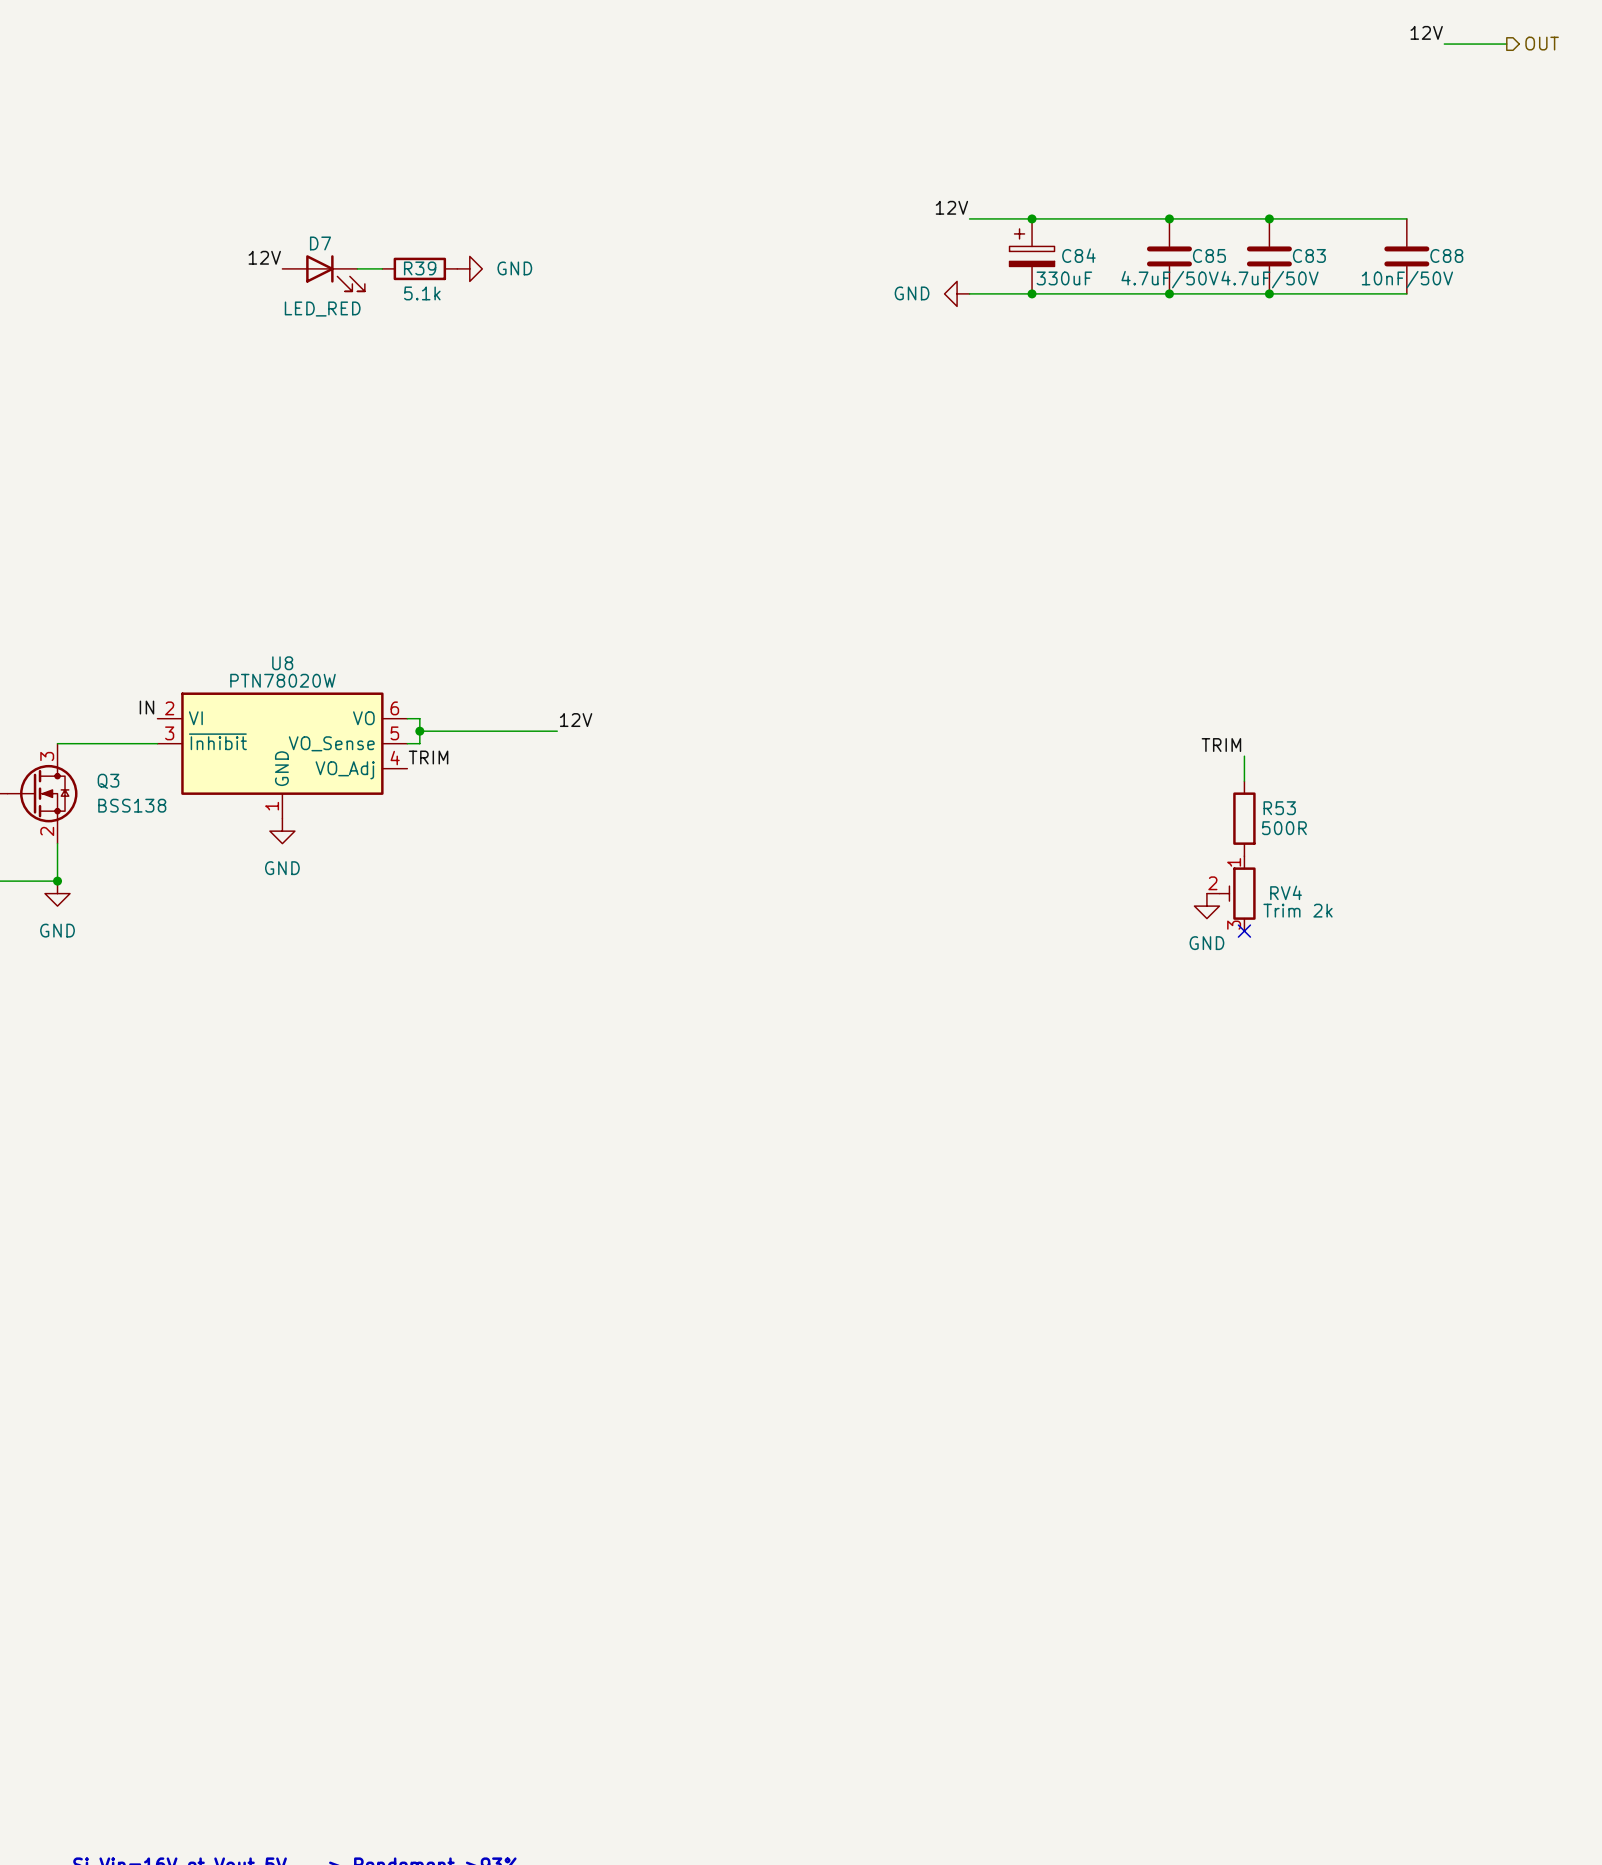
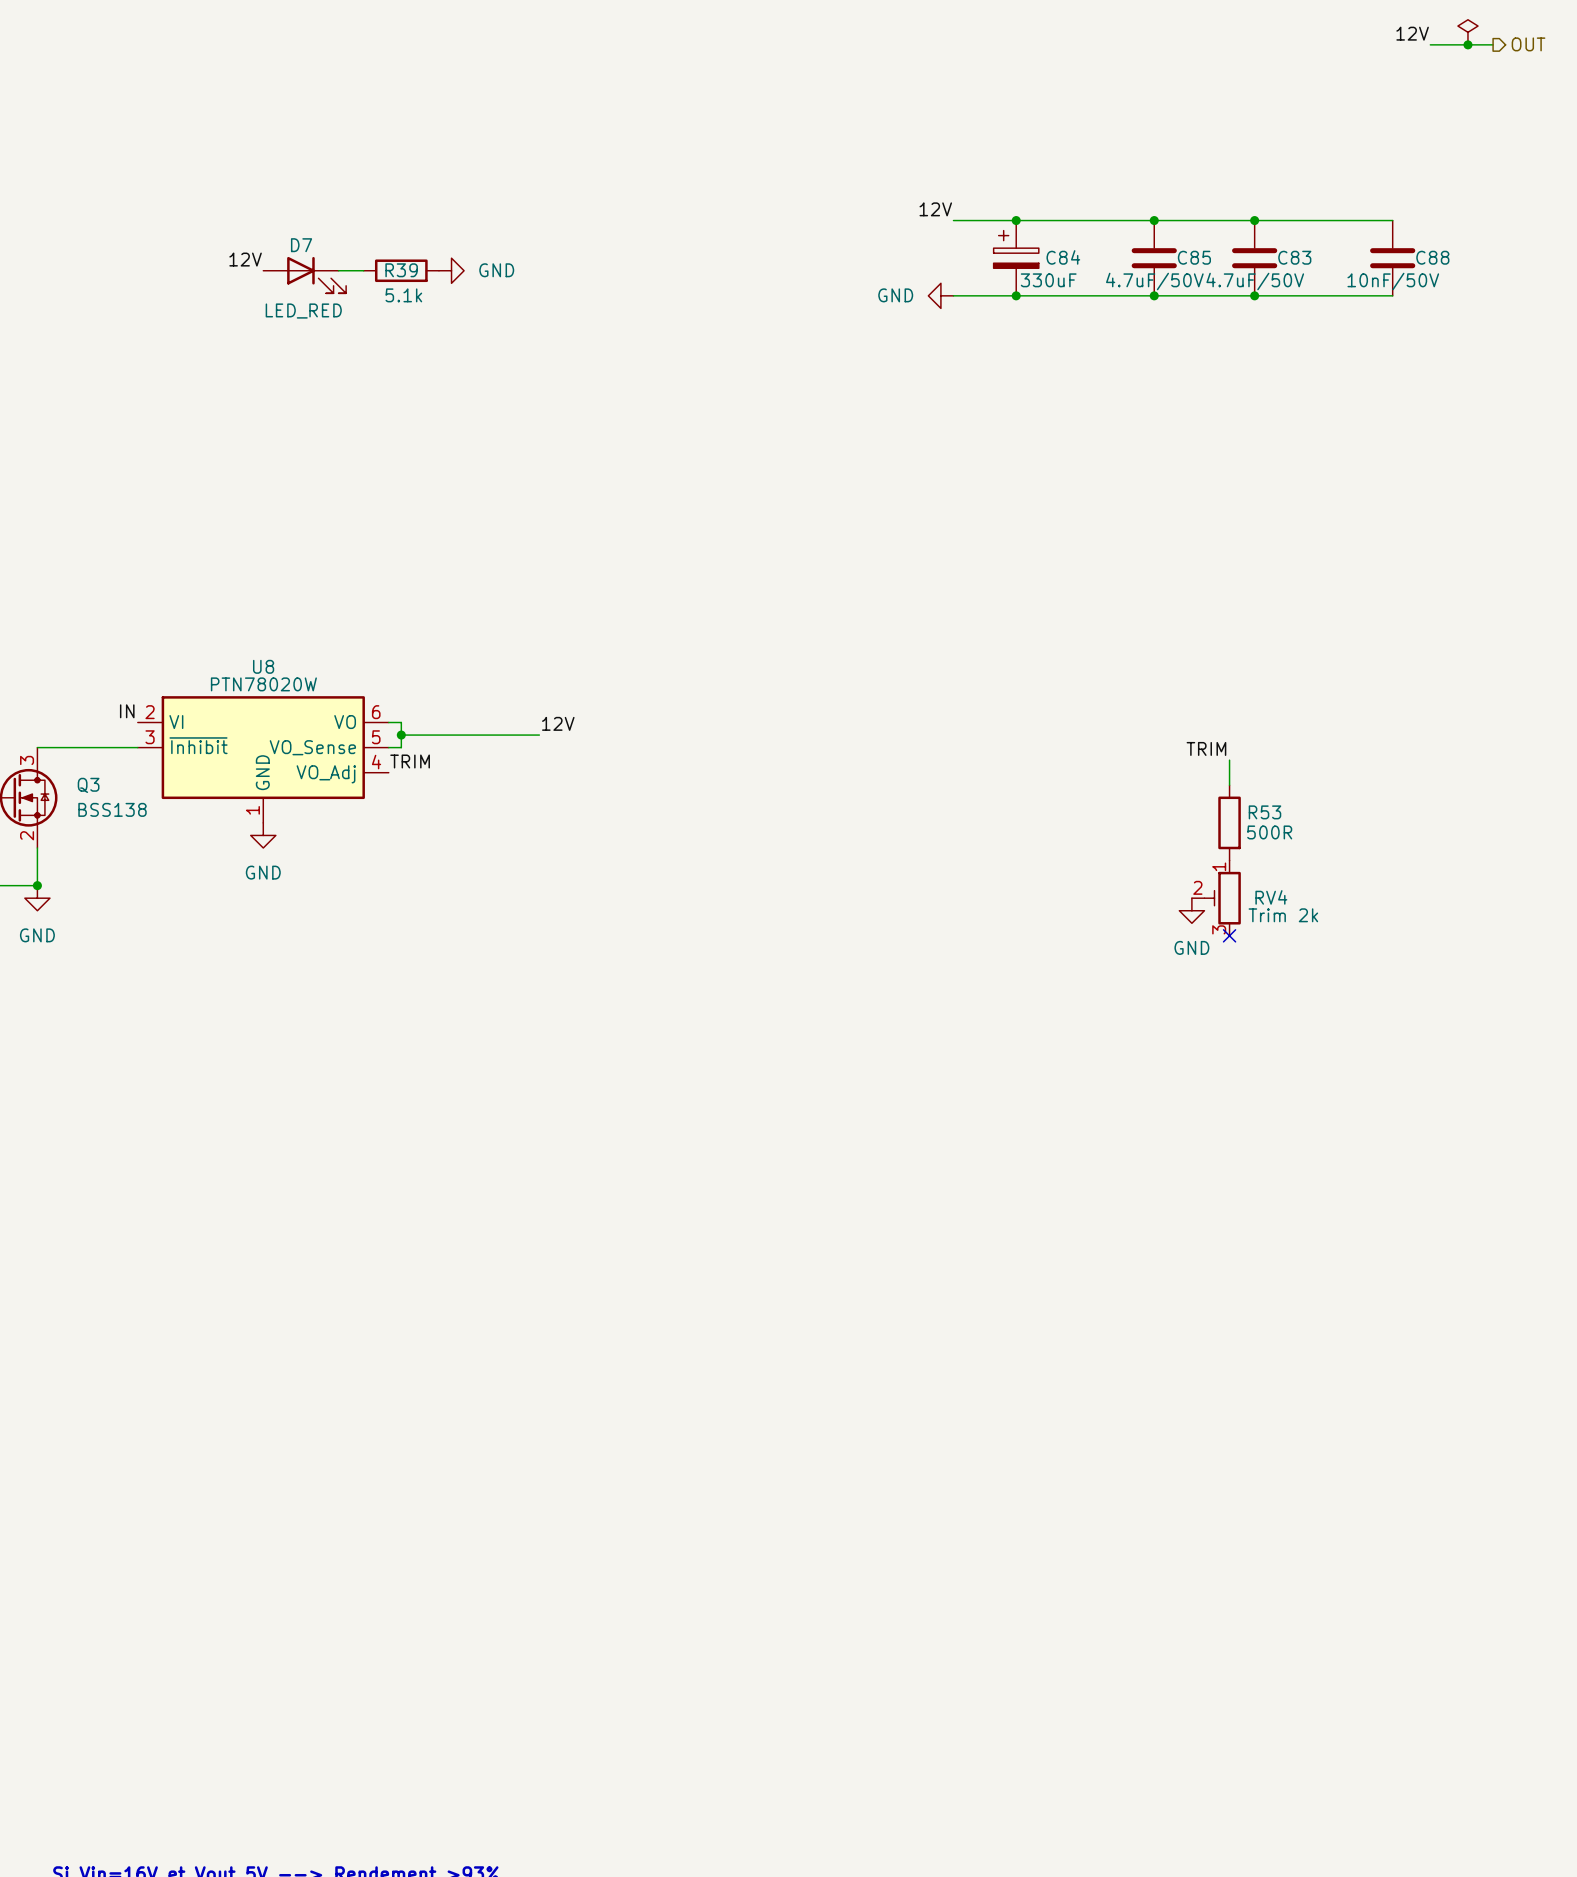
power symbol: none -> (1467, 32)
junction: none -> (1467, 44)

